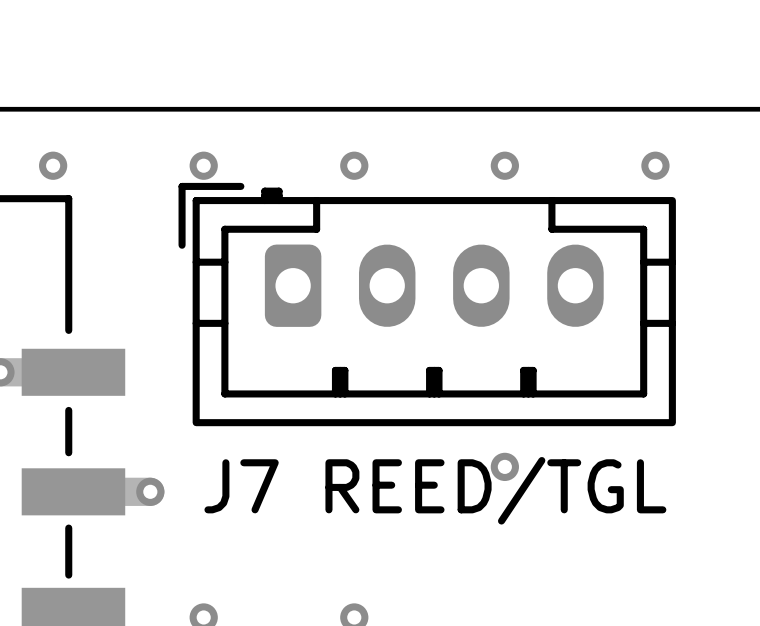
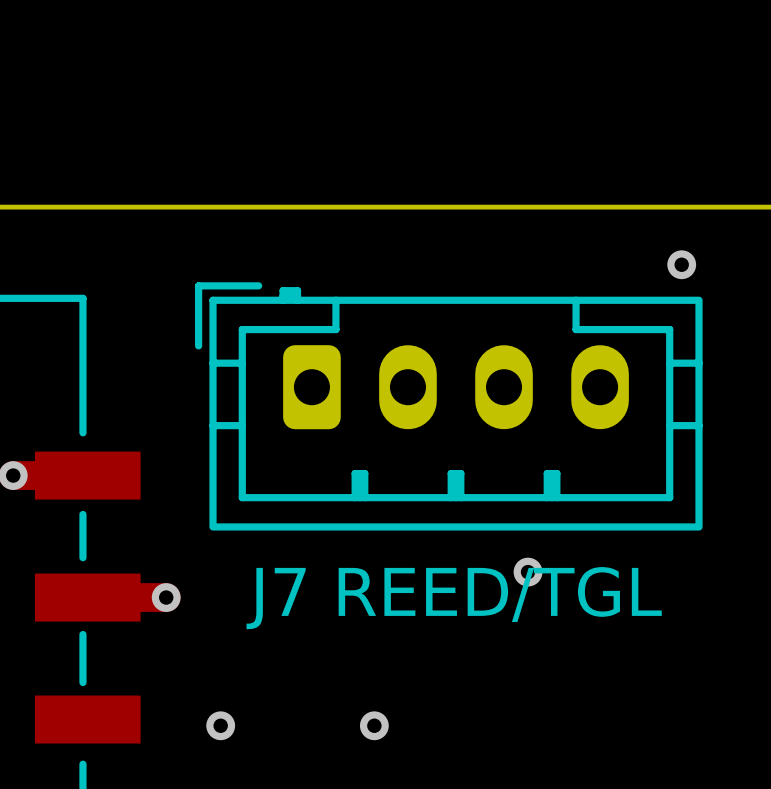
via: (53, 165) -> none
via: (203, 165) -> none
via: (354, 165) -> none
via: (504, 165) -> none

